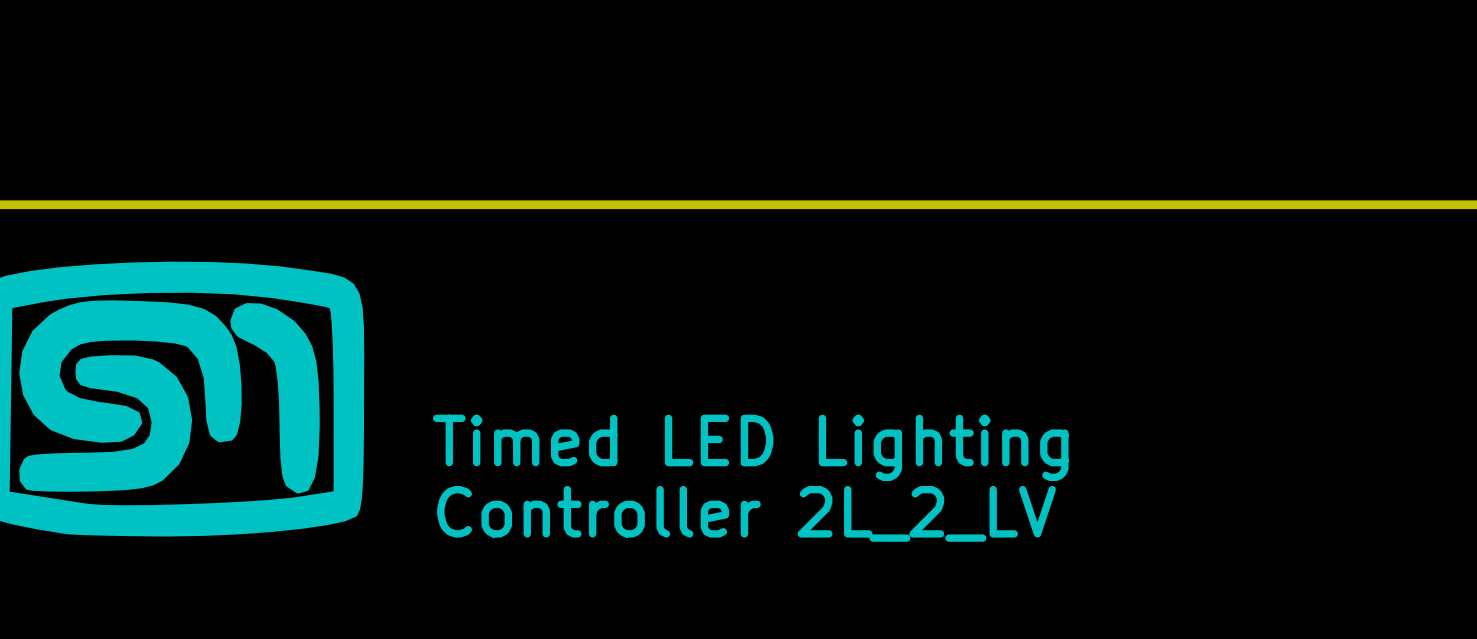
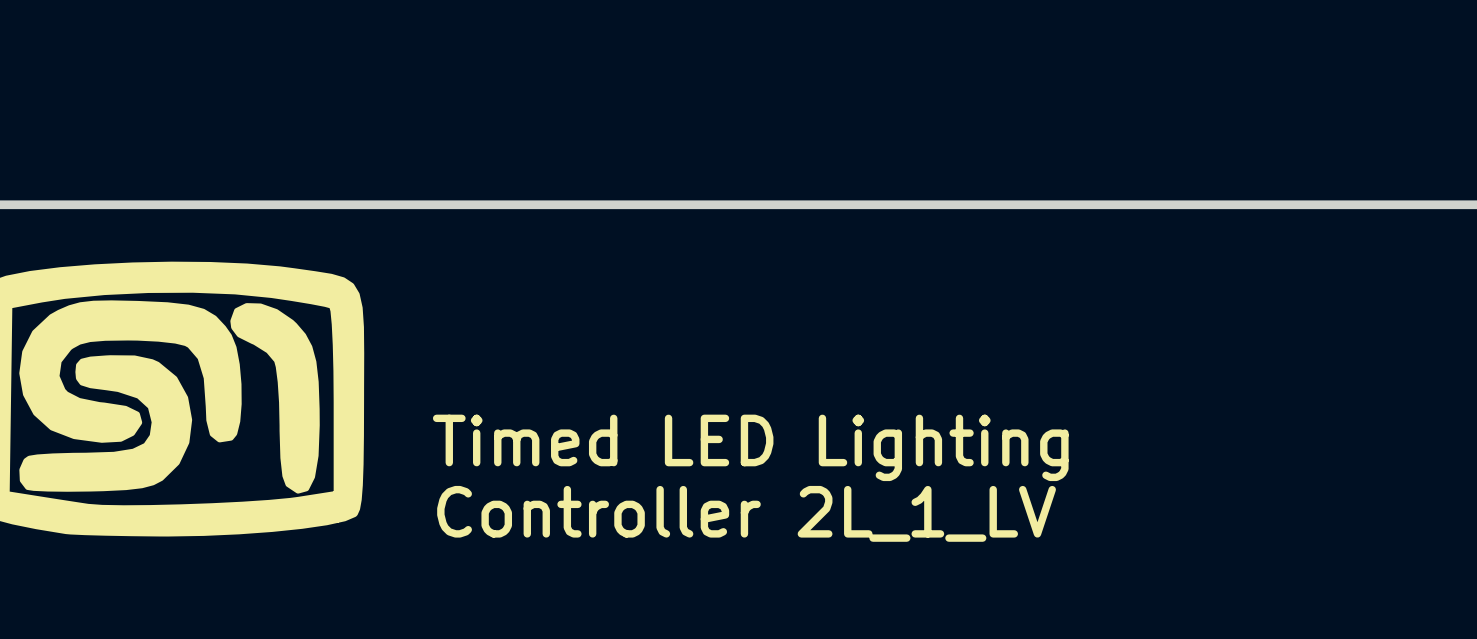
text: Controller 2L_2_LV (746, 513) -> Controller 2L_1_LV (746, 513)

